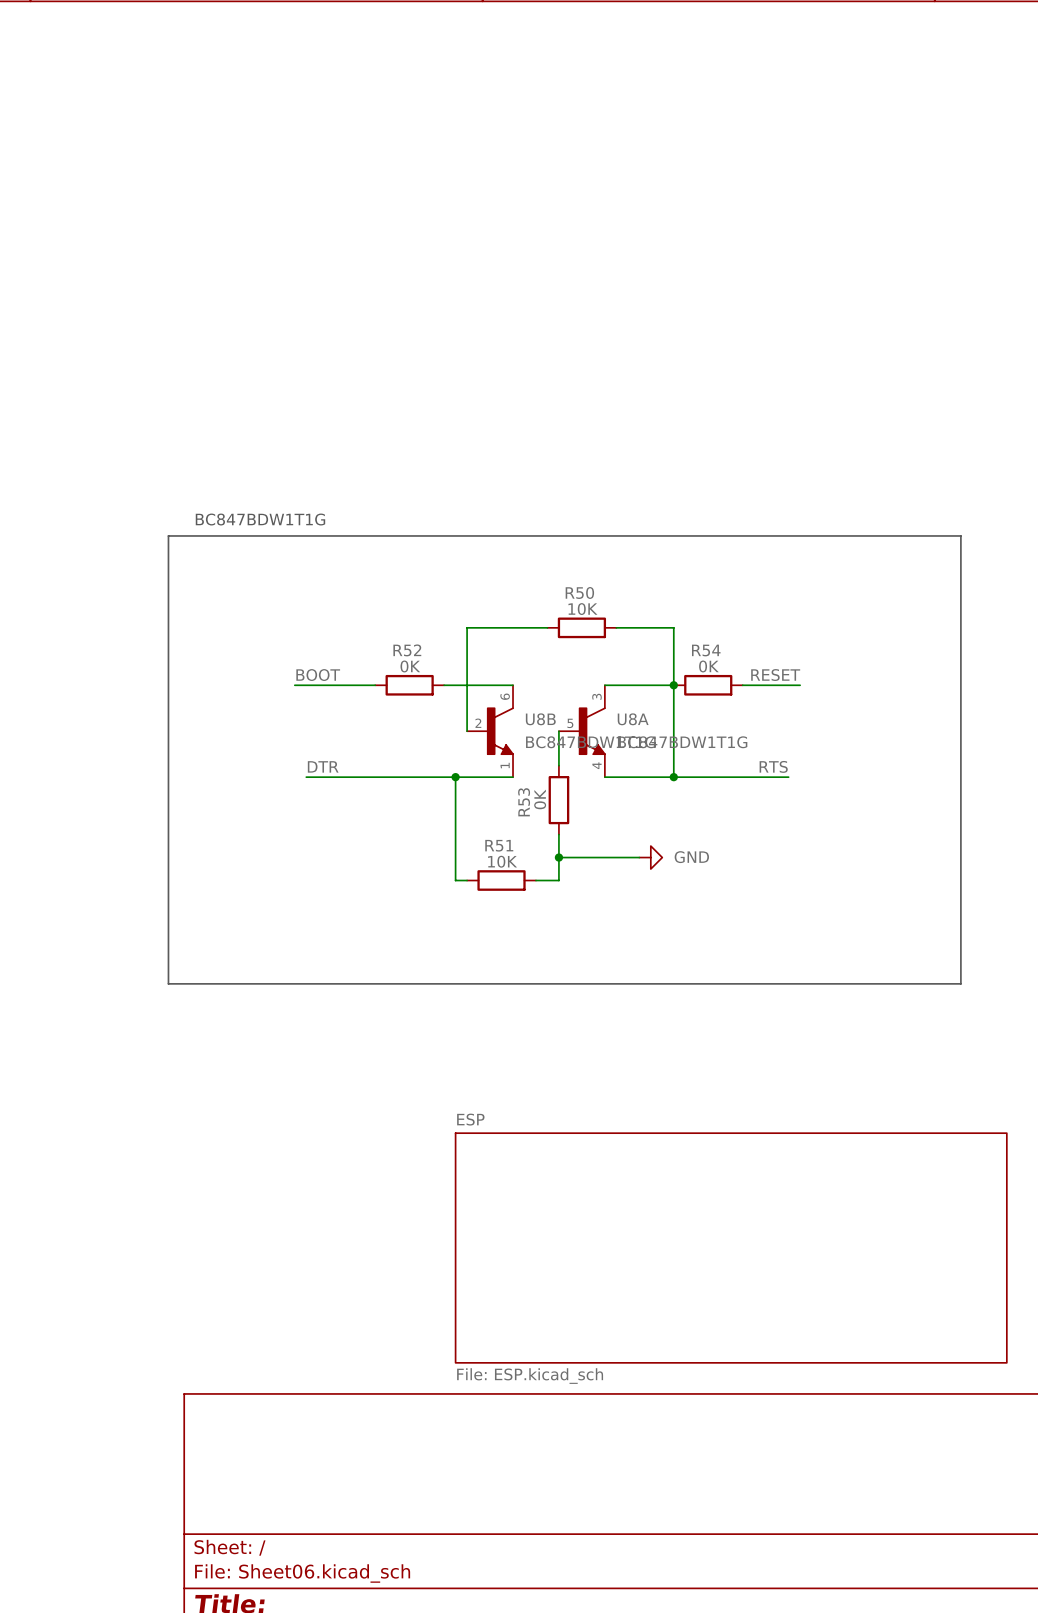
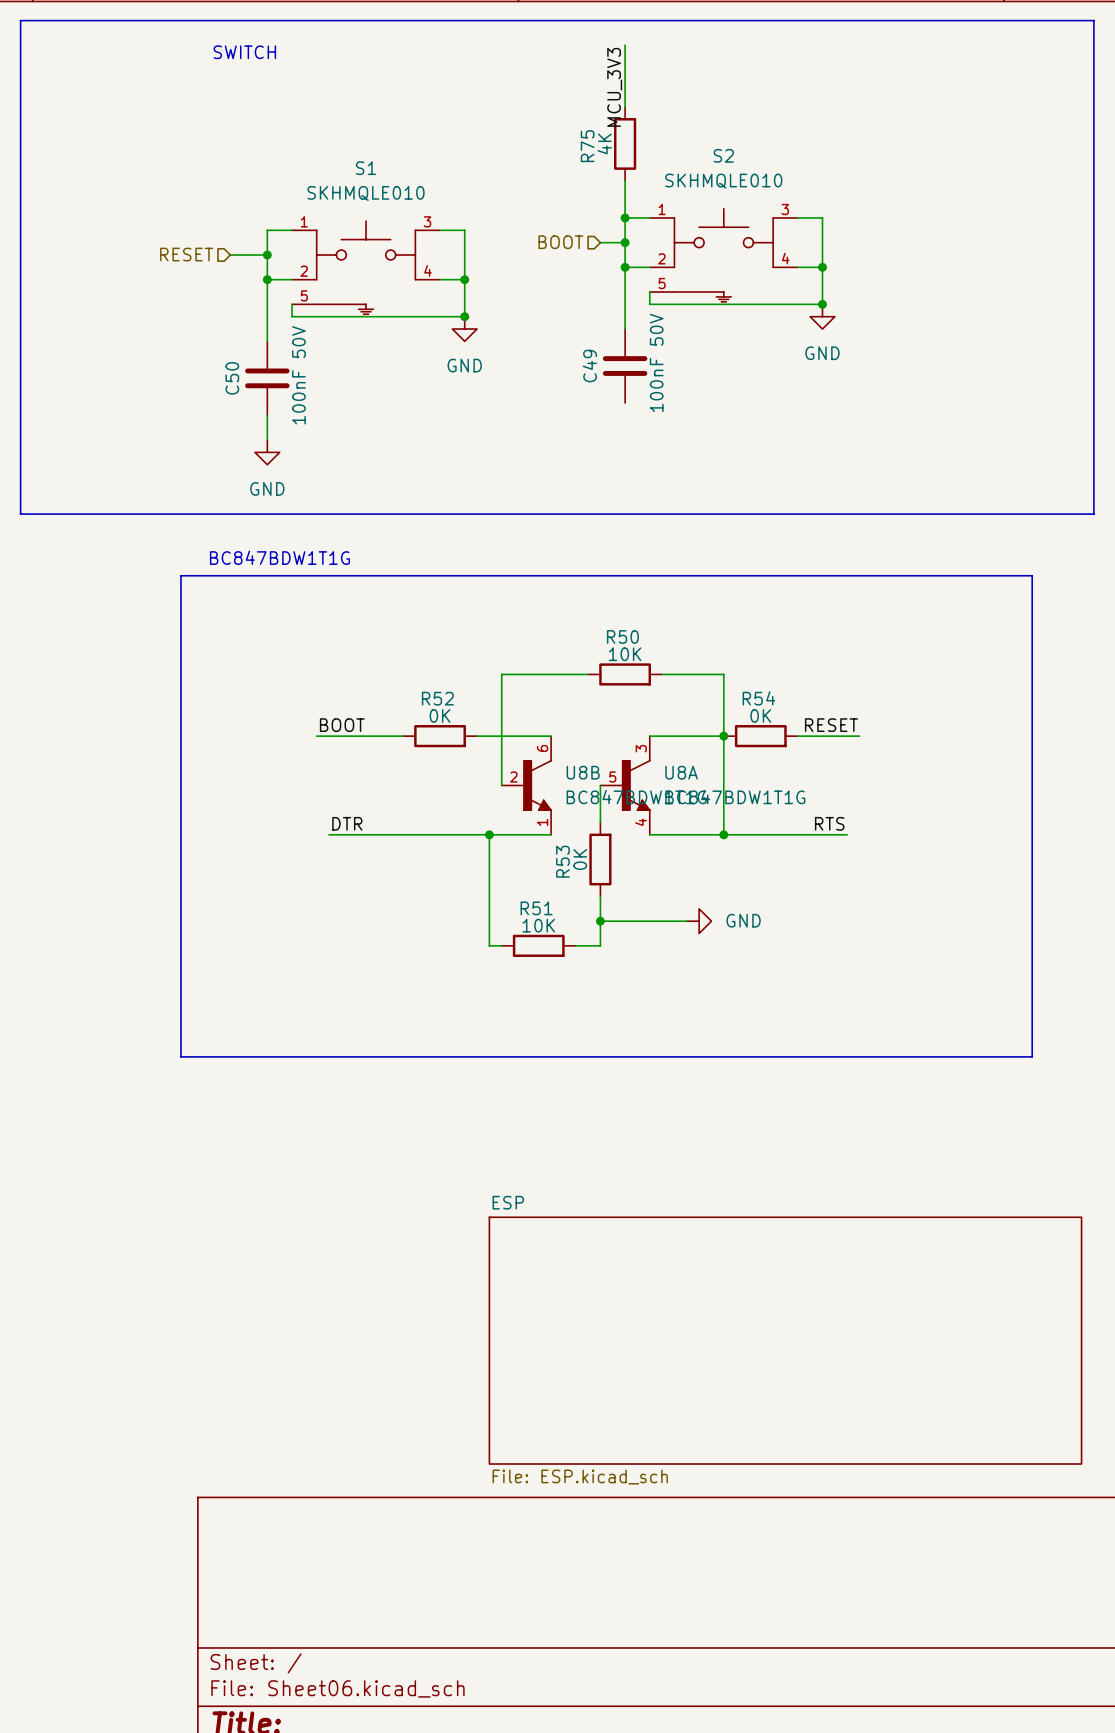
line: none -> (20, 20) (1093, 20) (1093, 514) (20, 514) (20, 20)
wire: none -> (625, 45) (625, 106)
text: none -> SWITCH (244, 52)
label: none -> MCU_3V3 (614, 87)
R75: none -> 4K (625, 143)
wire: none -> (625, 180) (625, 329)
wire: none -> (625, 217) (649, 217)
junction: none -> (625, 217)
wire: none -> (797, 217) (822, 217) (822, 304) (649, 304) (649, 292)
wire: none -> (292, 230) (267, 230) (267, 341)
wire: none -> (440, 230) (464, 230) (464, 316) (292, 316) (292, 304)
hierarchical label: none -> BOOT (560, 242)
wire: none -> (600, 242) (625, 242)
junction: none -> (625, 242)
hierarchical label: none -> RESET (186, 254)
wire: none -> (230, 255) (267, 255)
junction: none -> (267, 255)
S2: none -> SKHMQLE010 (723, 255)
wire: none -> (625, 267) (649, 267)
junction: none -> (625, 267)
wire: none -> (797, 267) (822, 267)
junction: none -> (822, 267)
S1: none -> SKHMQLE010 (366, 267)
wire: none -> (267, 279) (292, 279)
junction: none -> (267, 279)
wire: none -> (440, 279) (464, 279)
junction: none -> (464, 279)
junction: none -> (822, 304)
junction: none -> (464, 316)
power symbol: none -> GND (822, 316)
power symbol: none -> GND (464, 329)
C49: none -> 100nF 50V (625, 366)
C50: none -> 100nF 50V (267, 378)
wire: none -> (267, 415) (267, 440)
power symbol: none -> GND (267, 452)

